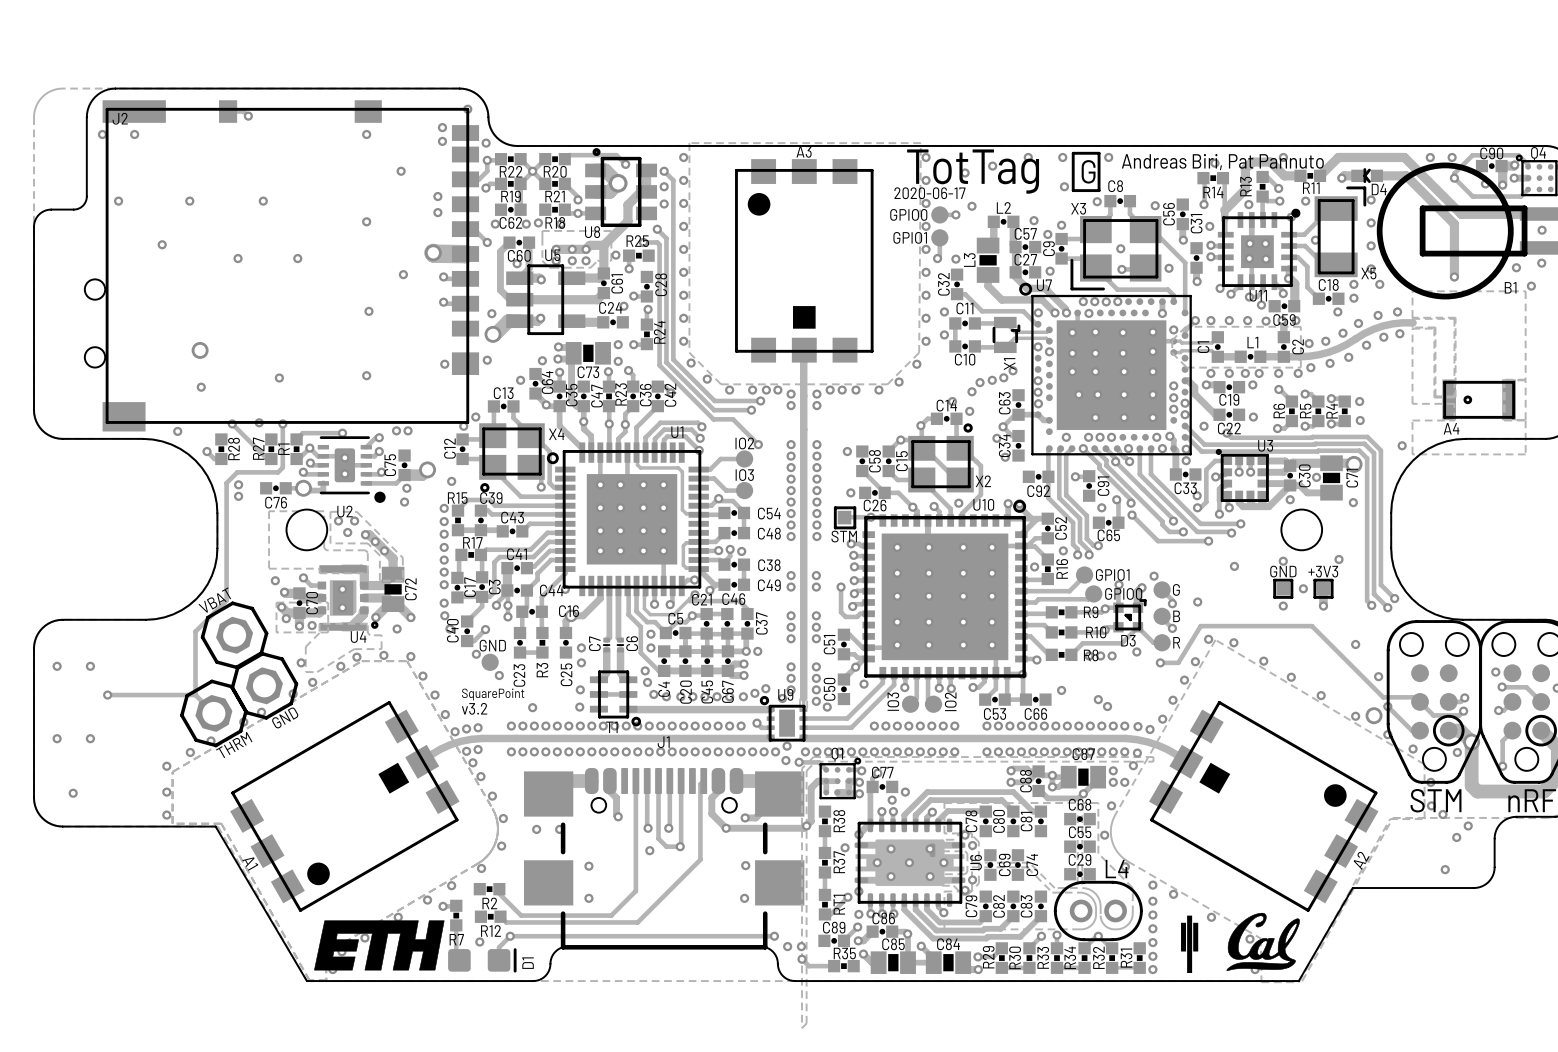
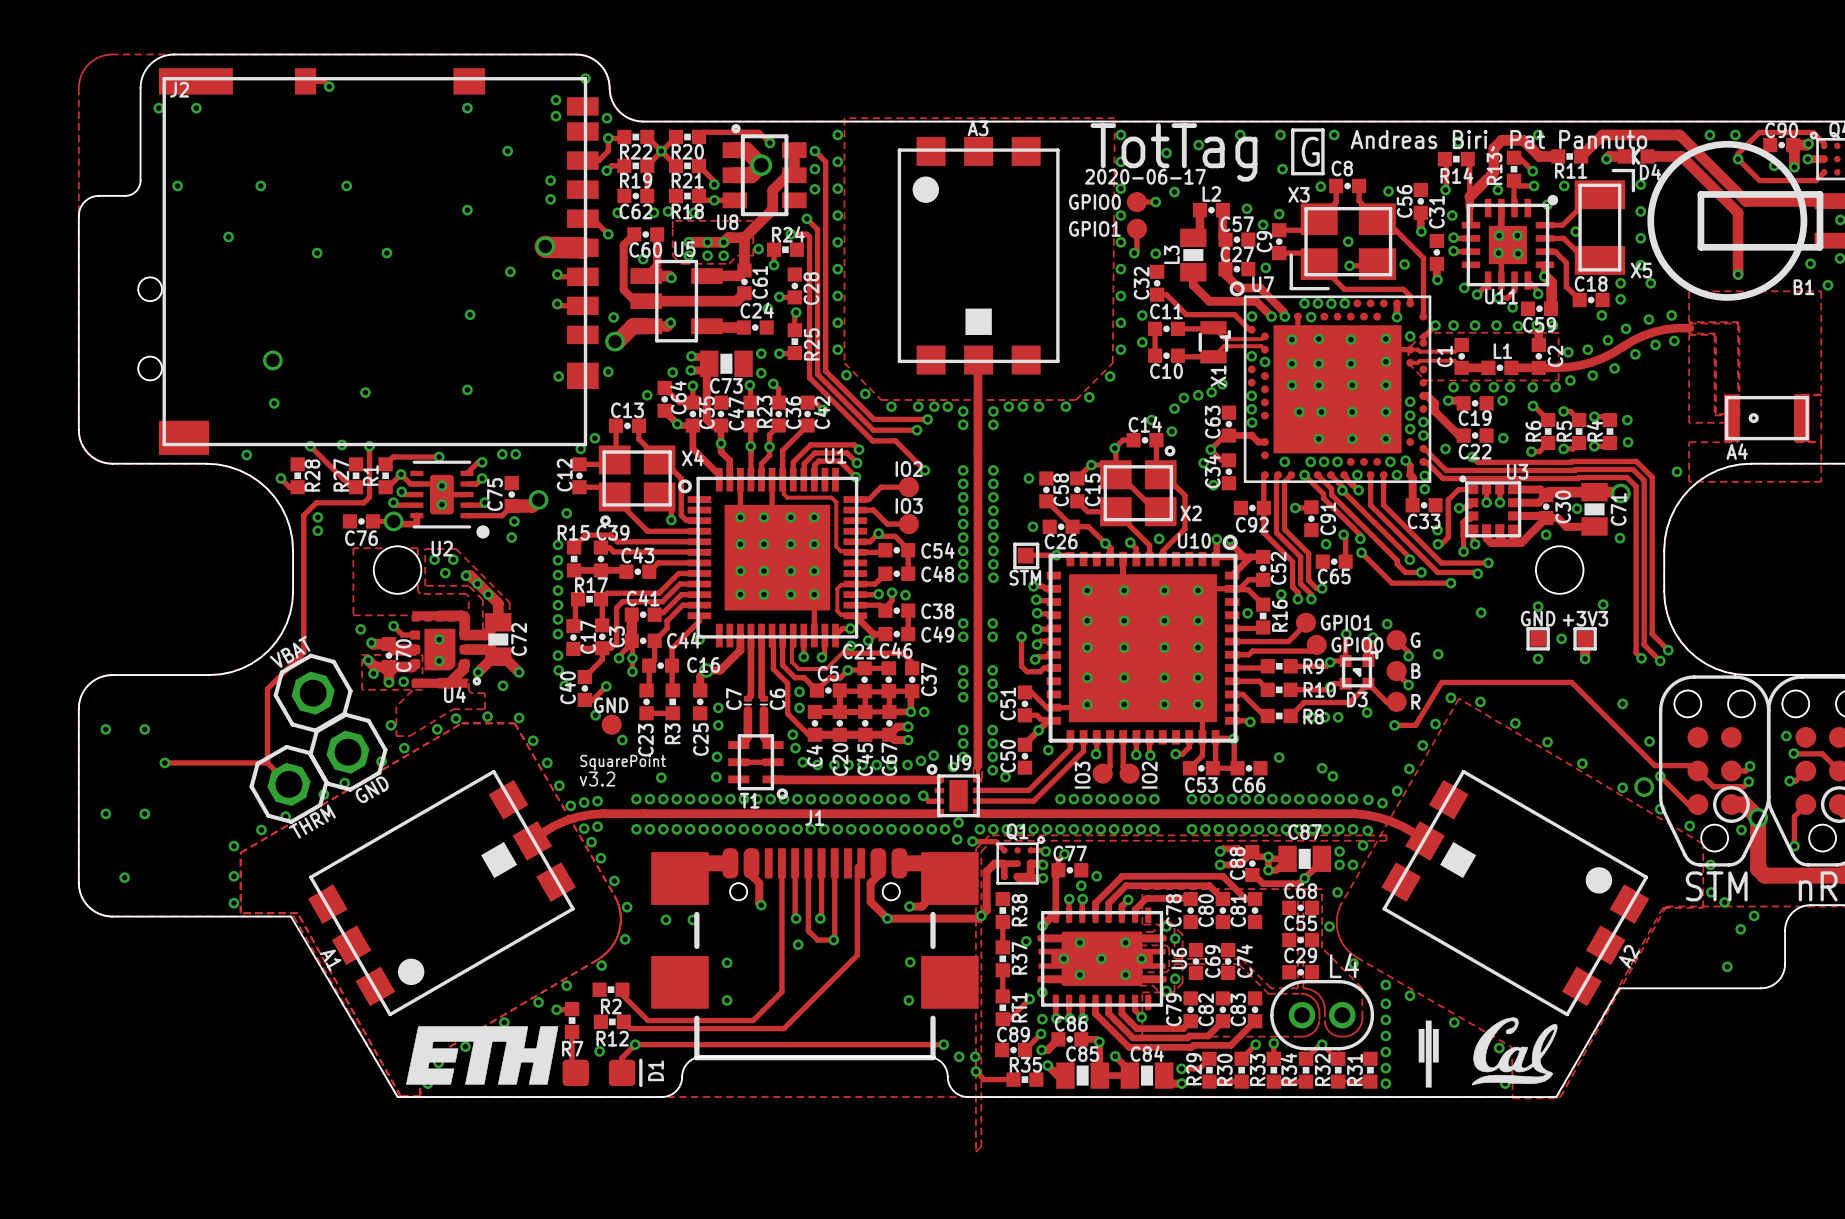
R25 name: R25 (637, 241) -> R24 (788, 234)
R24 name: R24 (659, 332) -> R25 (811, 344)

